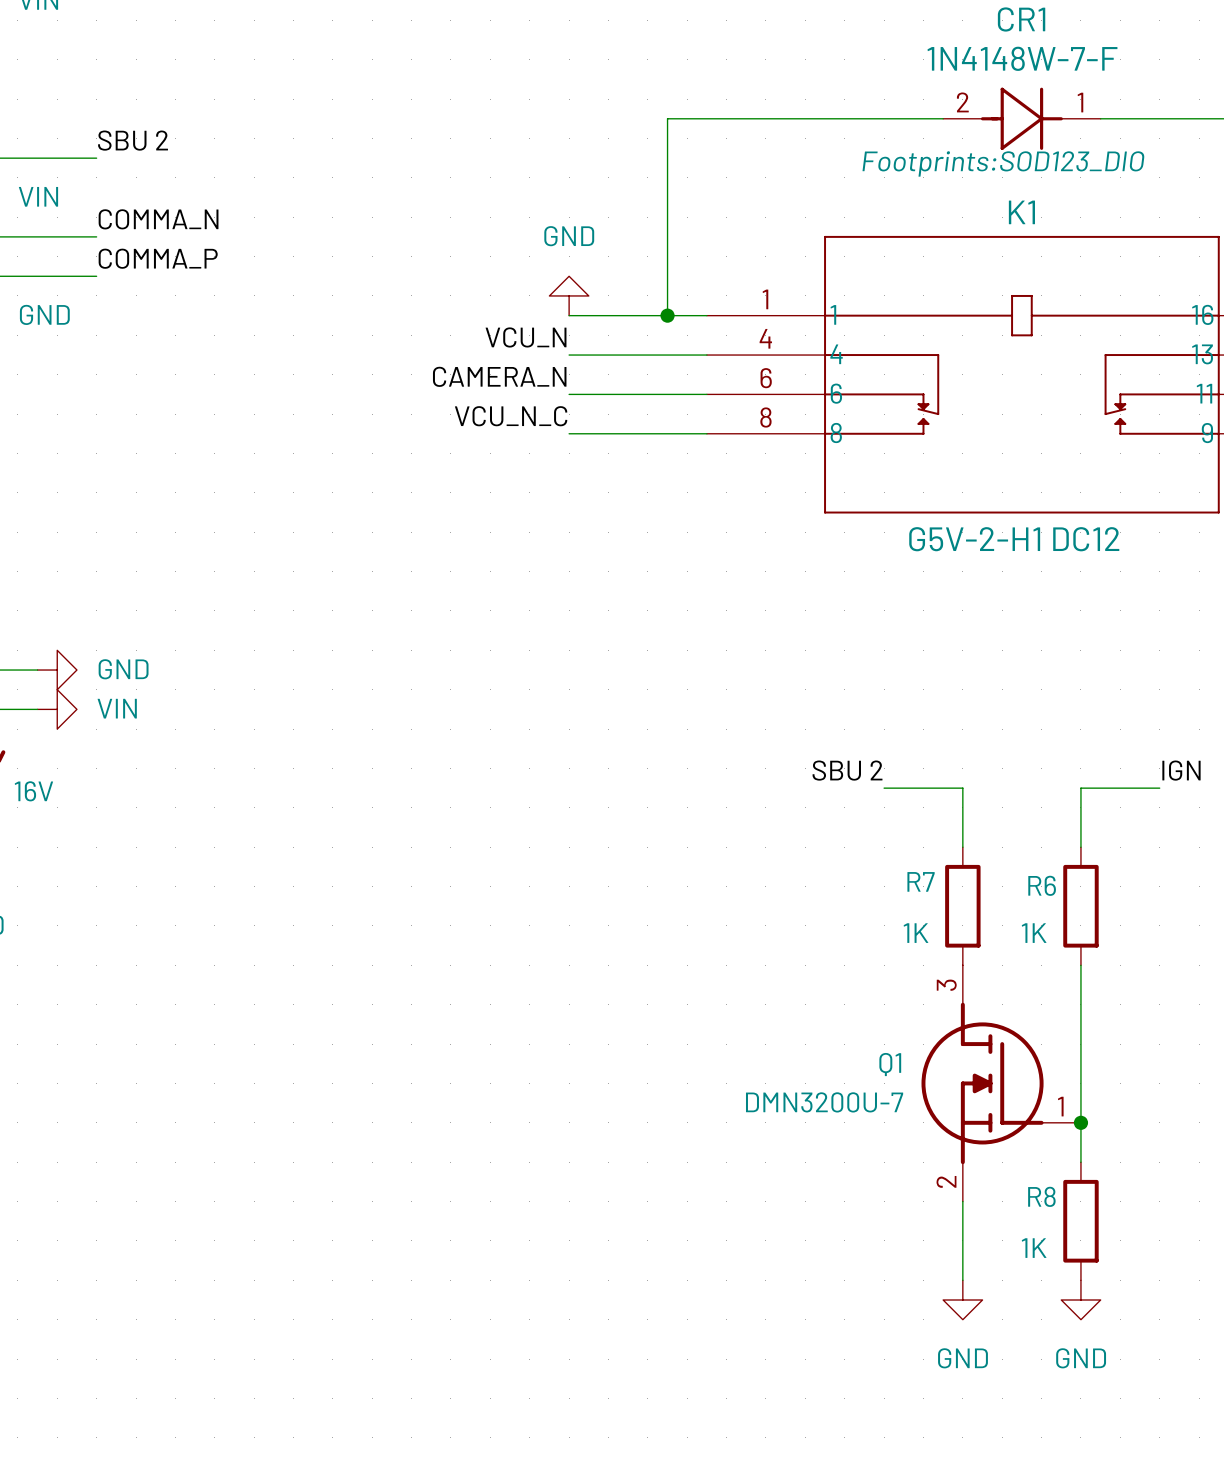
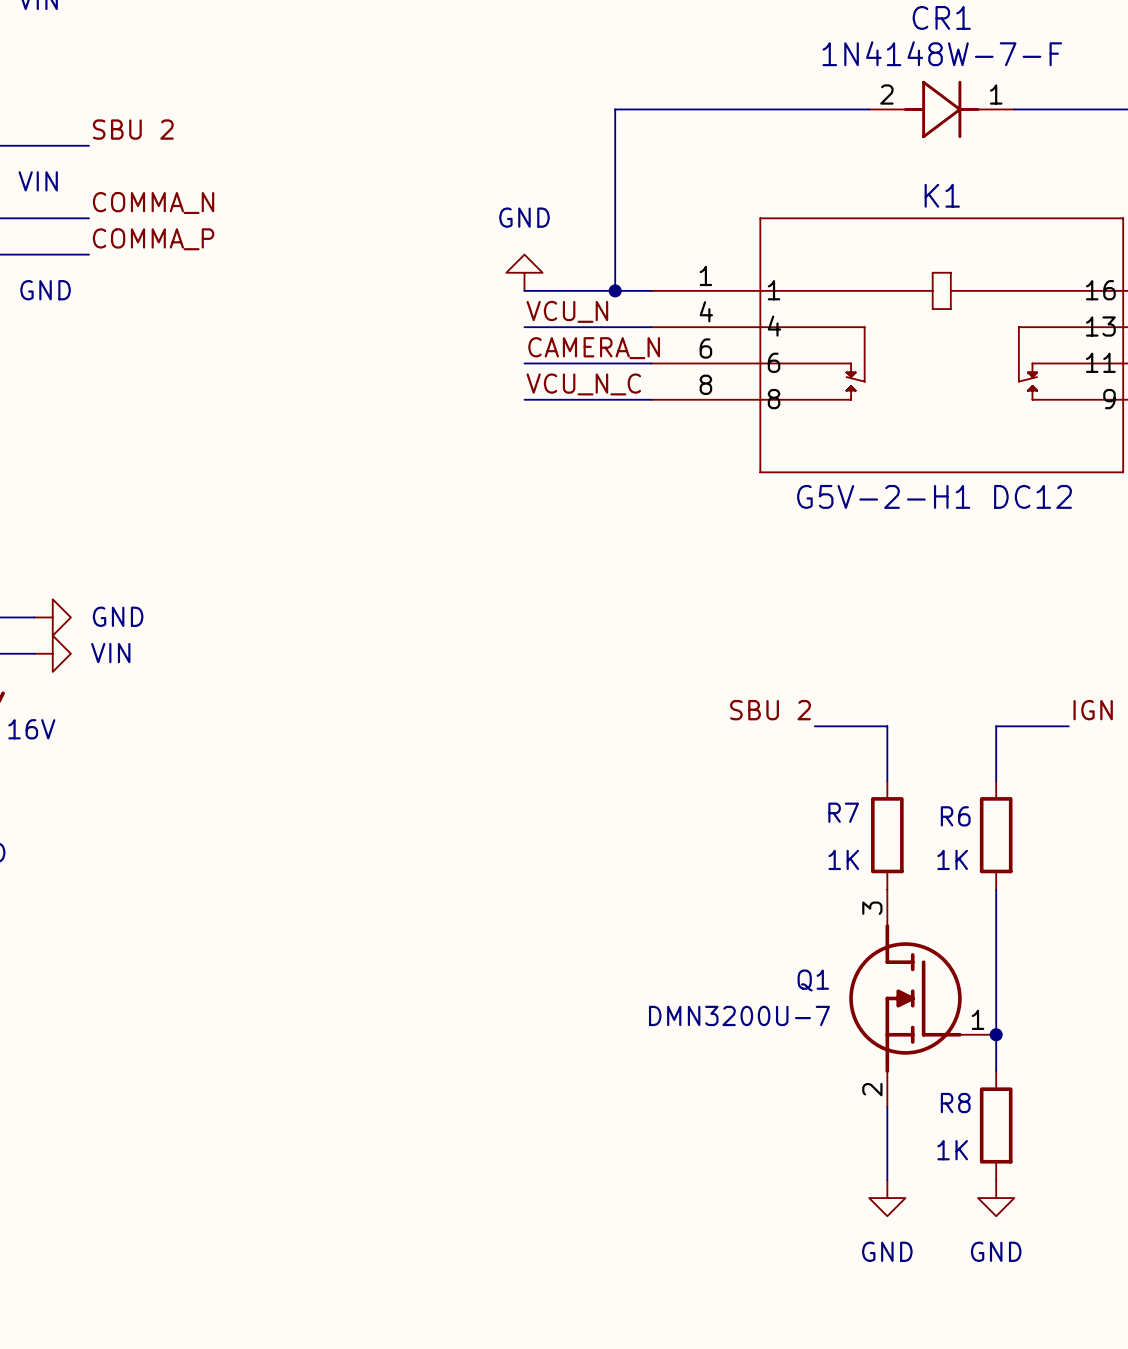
CR1 text: Footprints:SOD123_DIO (1003, 163) -> none
label position: VCU_N (526, 337) -> VCU_N (567, 311)
label position: CAMERA_N (499, 376) -> CAMERA_N (594, 348)
label position: VCU_N_C (511, 416) -> VCU_N_C (583, 384)

